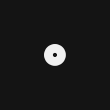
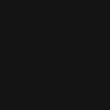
part: (54, 54) -> none

